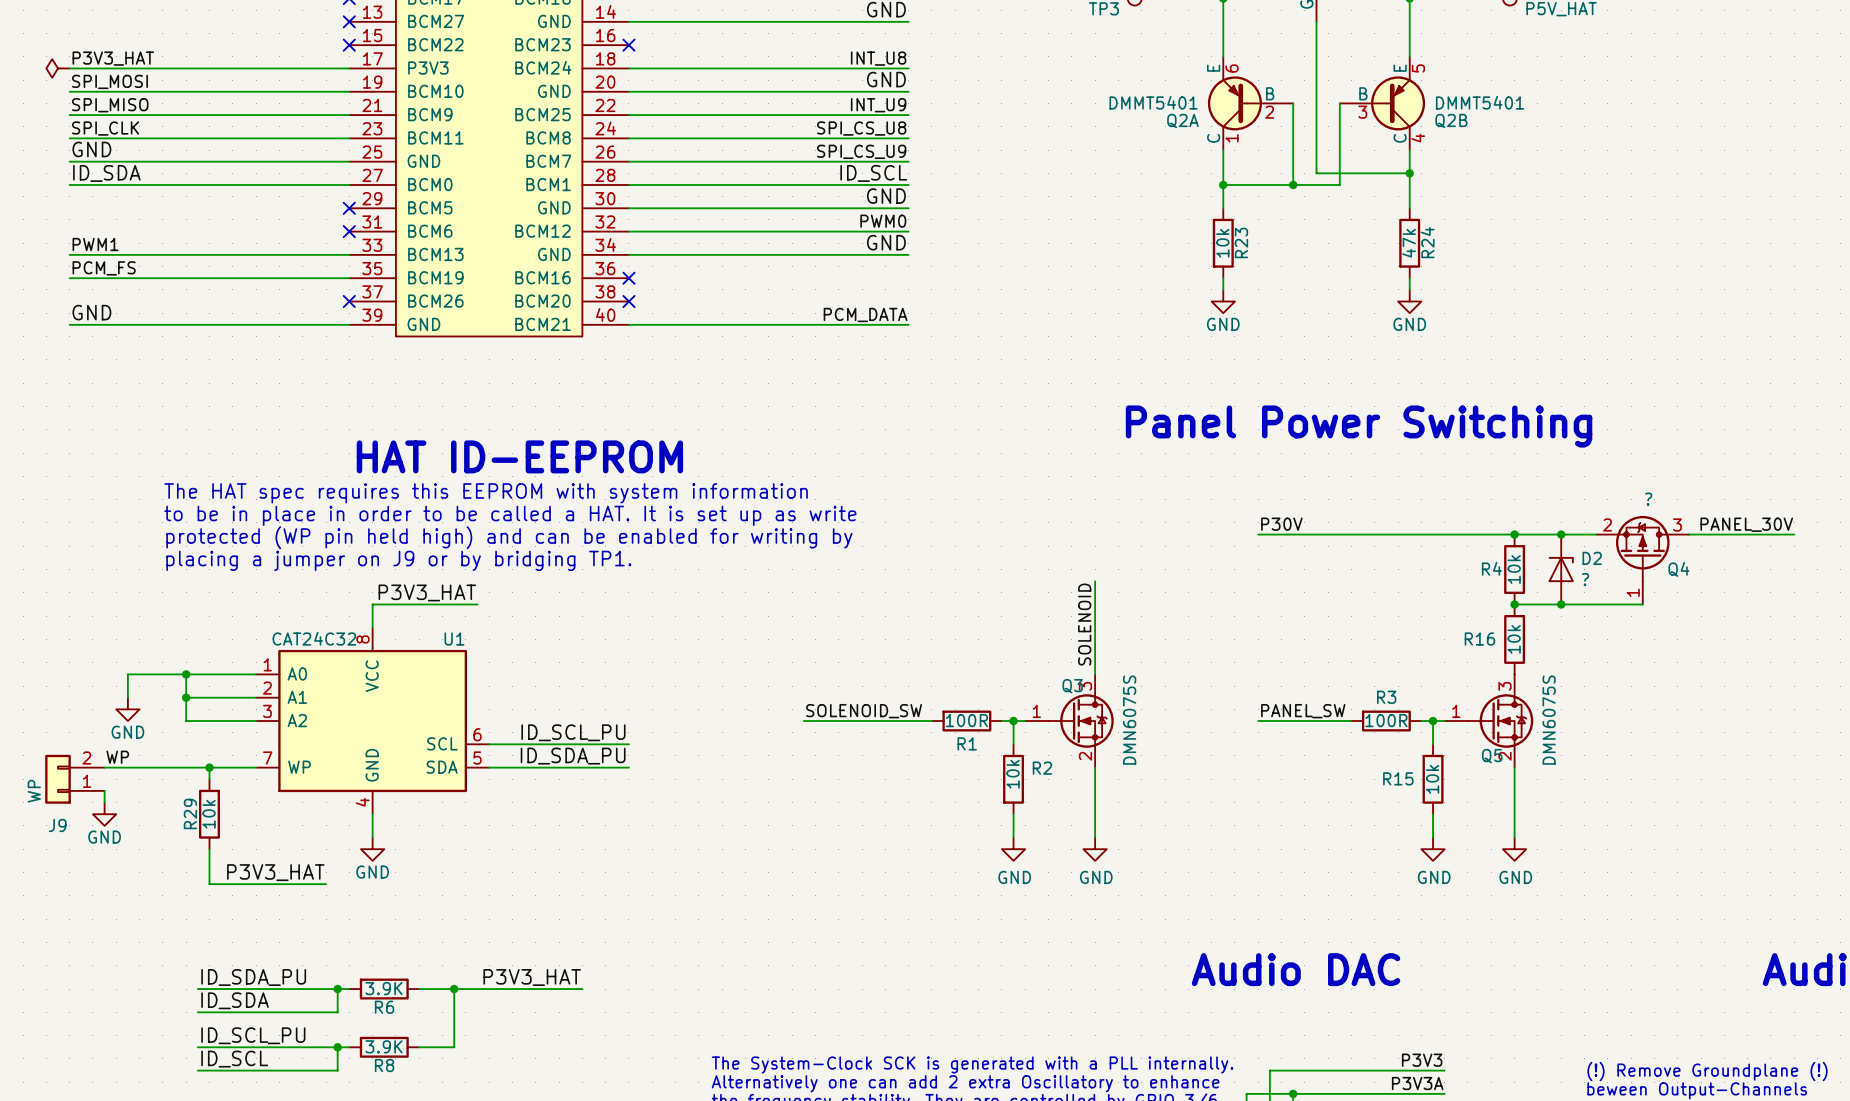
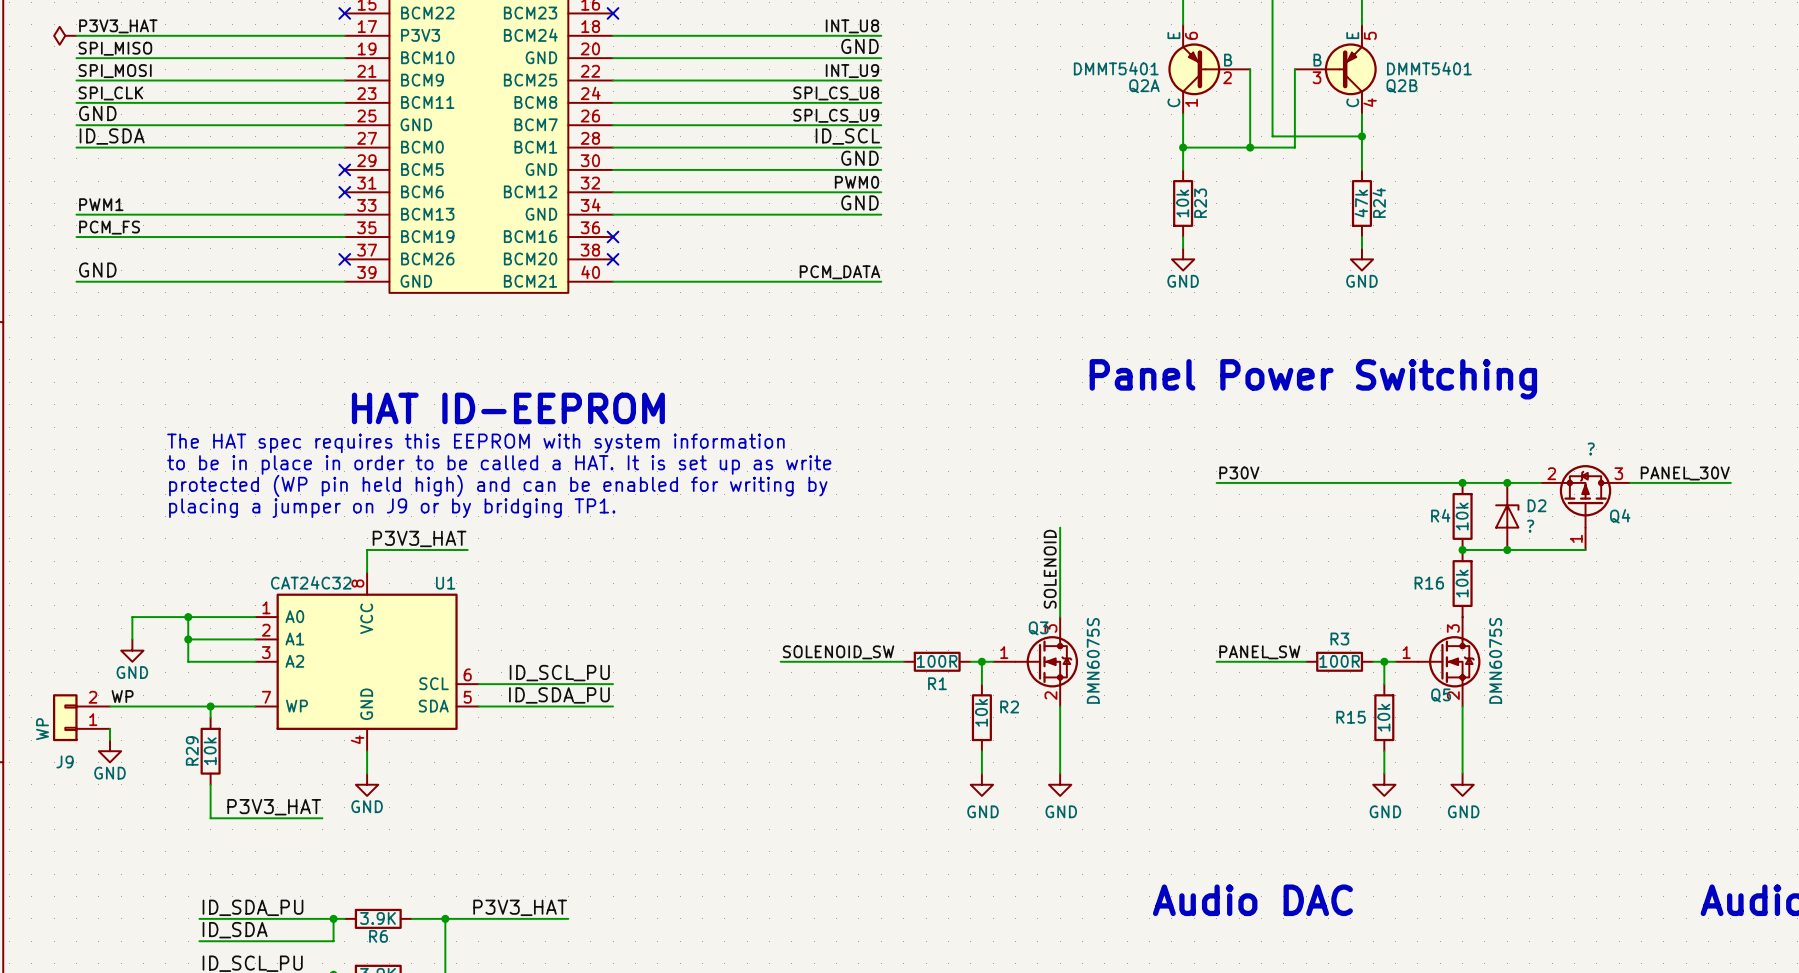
label: SPI_MOSI (109, 81) -> SPI_MISO (115, 48)
label: SPI_MISO (110, 105) -> SPI_MOSI (115, 71)

